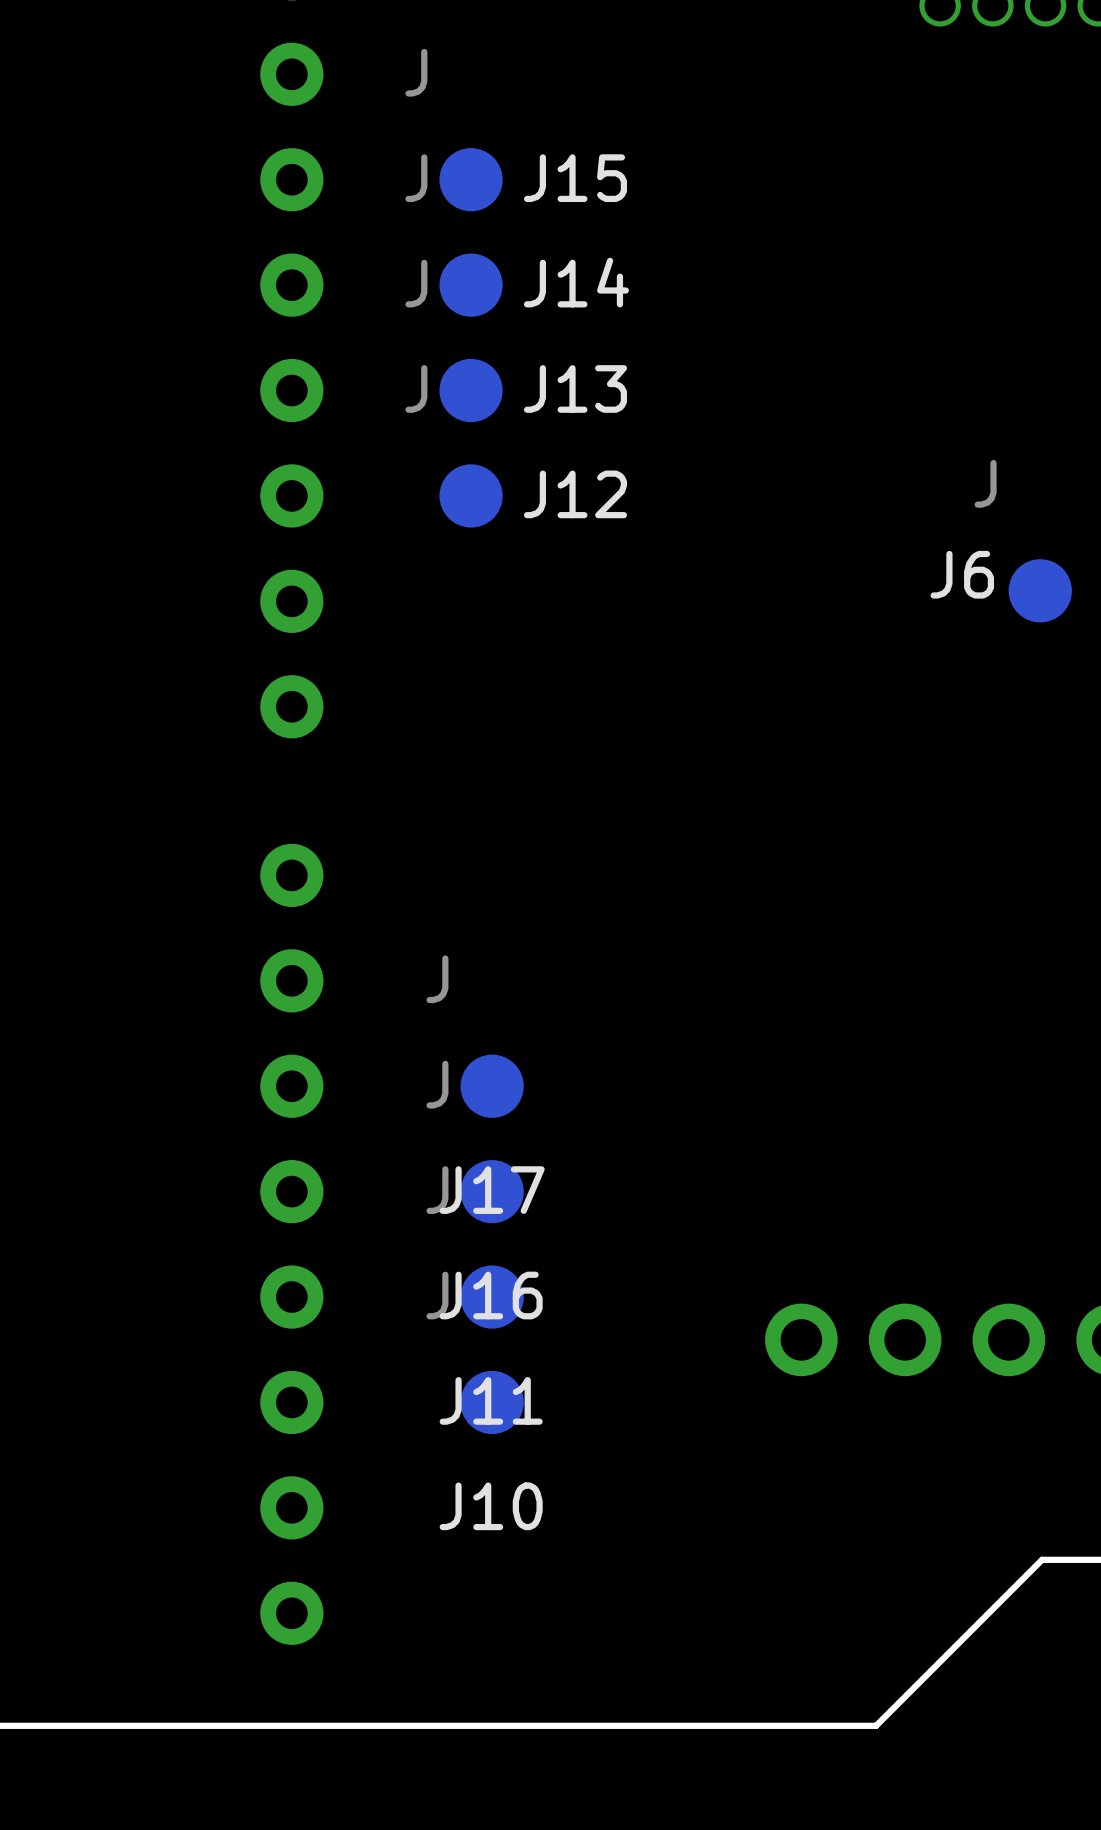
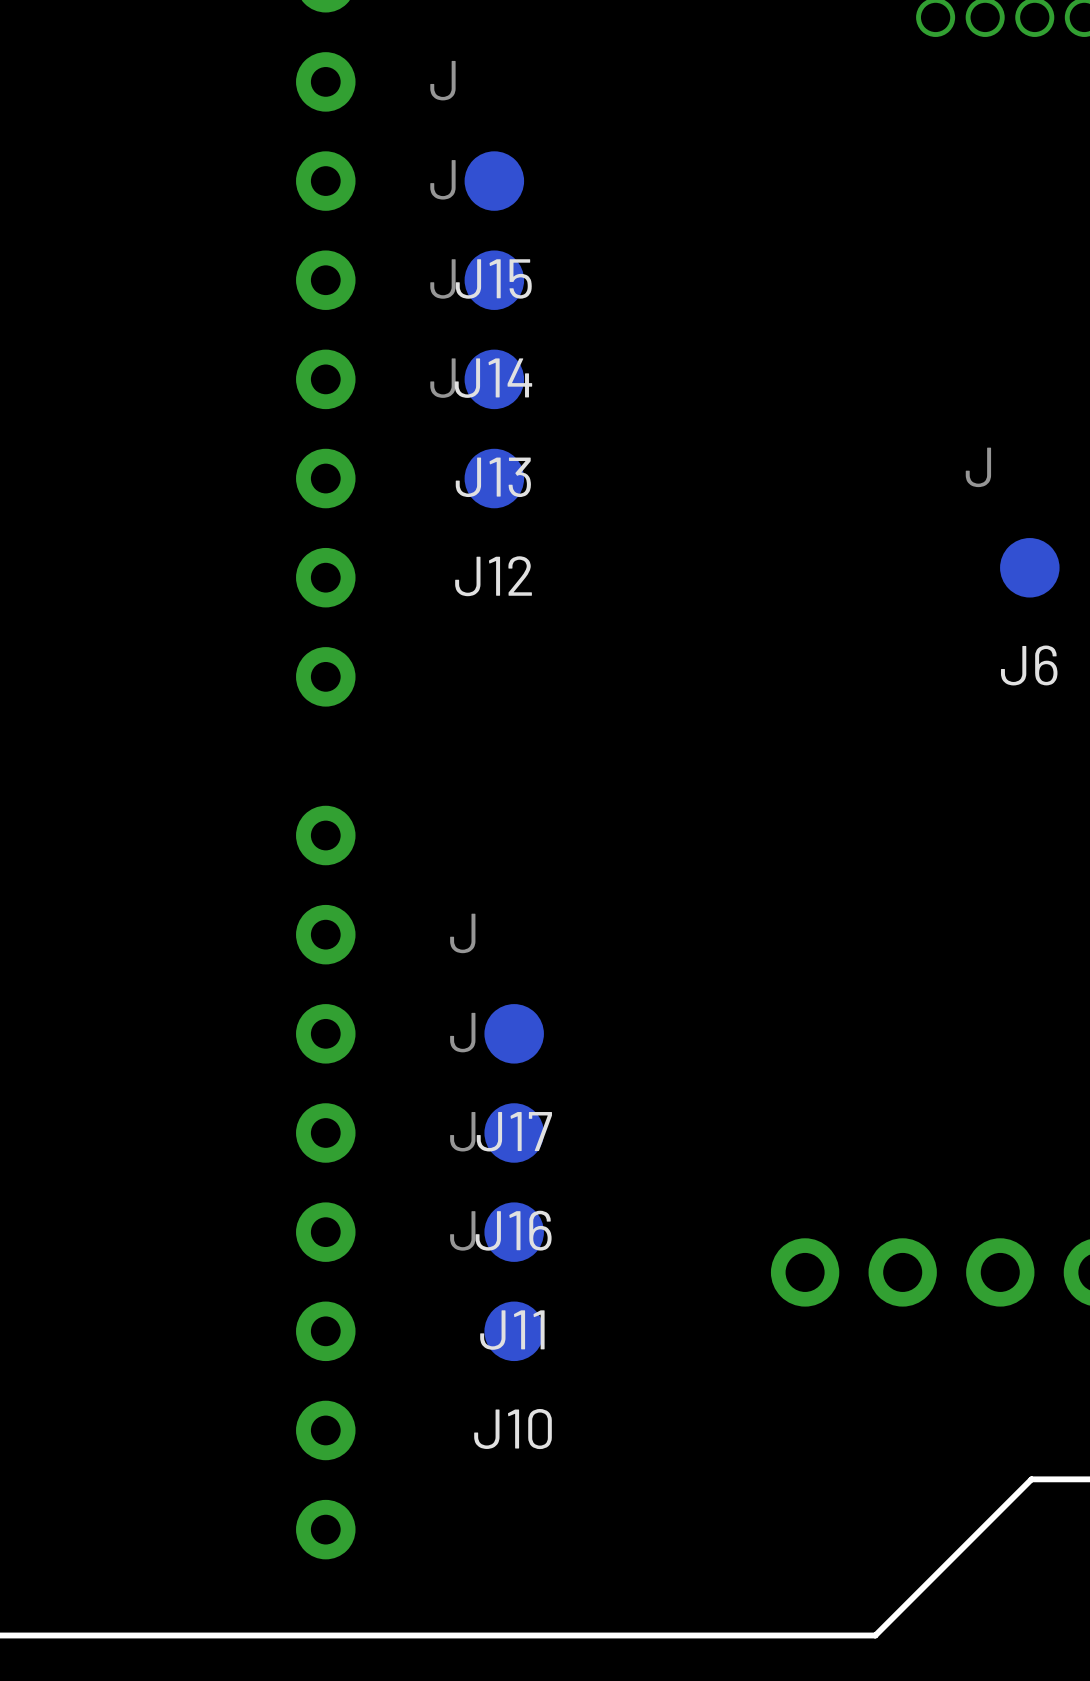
J15 name position: J15 (575, 178) -> J15 (493, 278)
J14 name position: J14 (576, 282) -> J14 (493, 378)
J13 name position: J13 (575, 388) -> J13 (493, 477)
J12 name position: J12 (575, 494) -> J12 (493, 576)
J6 name position: J6 (962, 574) -> J6 (1029, 665)

